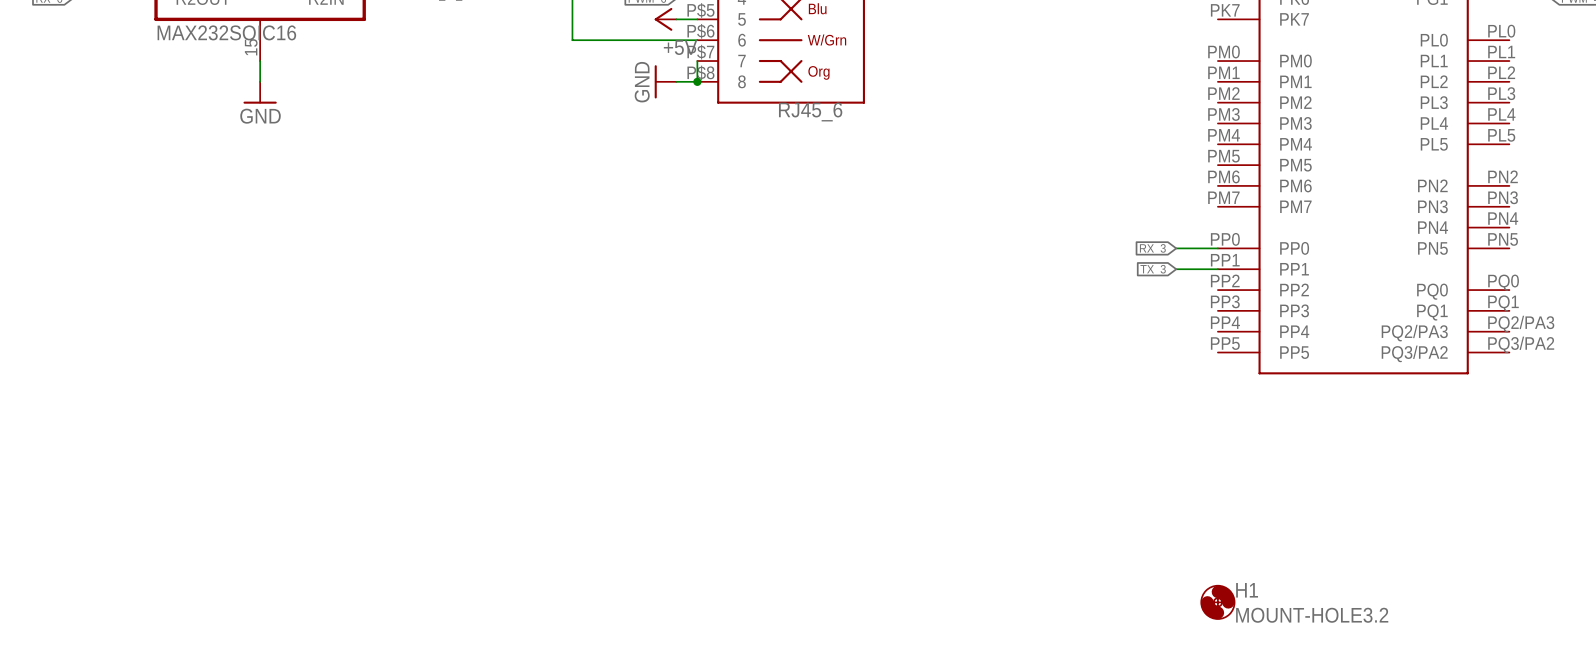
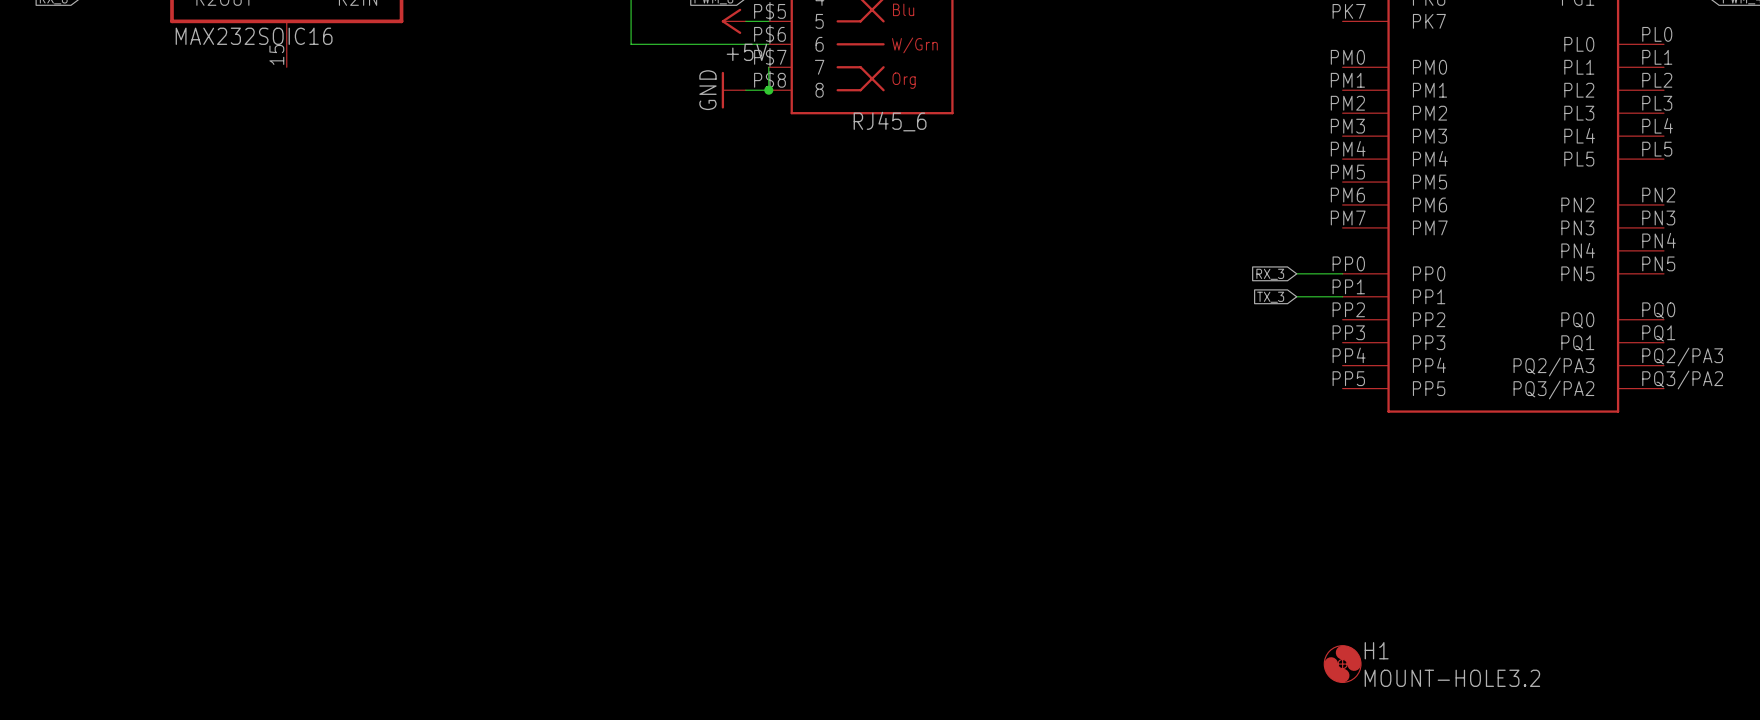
wire: (260, 61) (260, 81) -> none
power symbol: GND (260, 92) -> none

